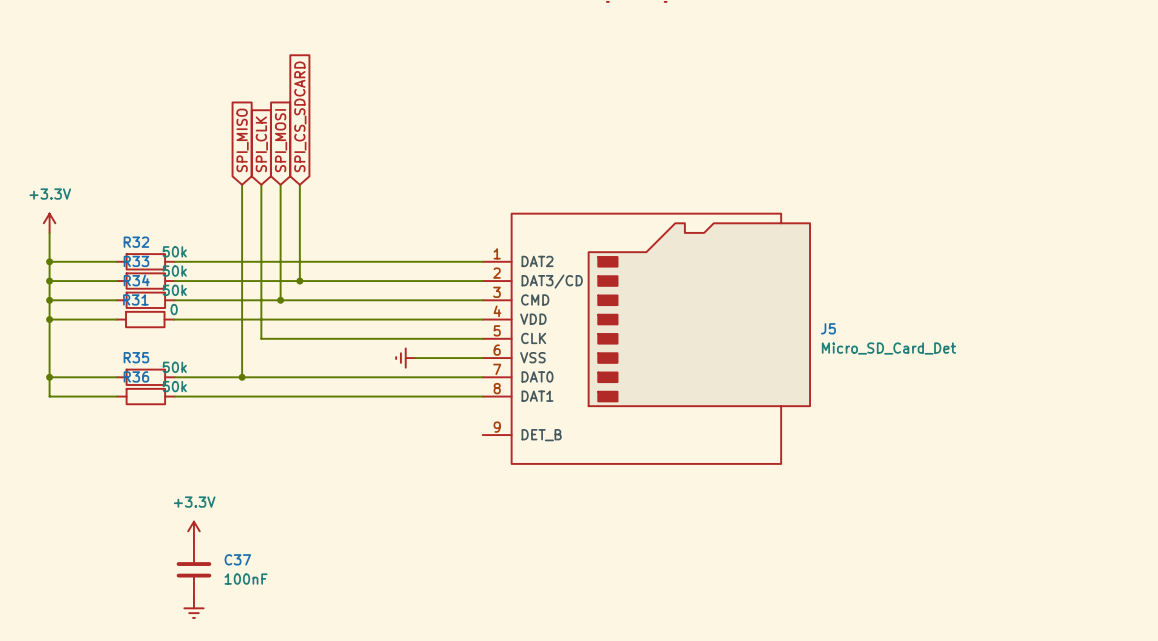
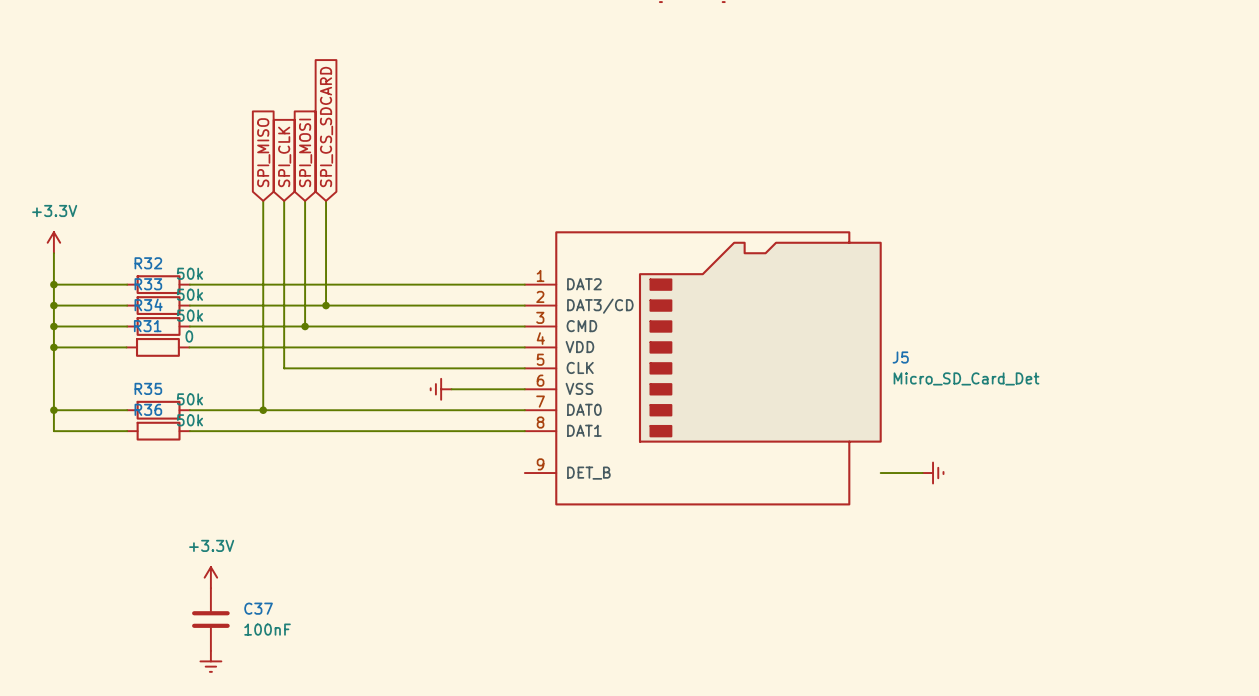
wire: none -> (880, 473) (922, 473)
power symbol: none -> (933, 473)

